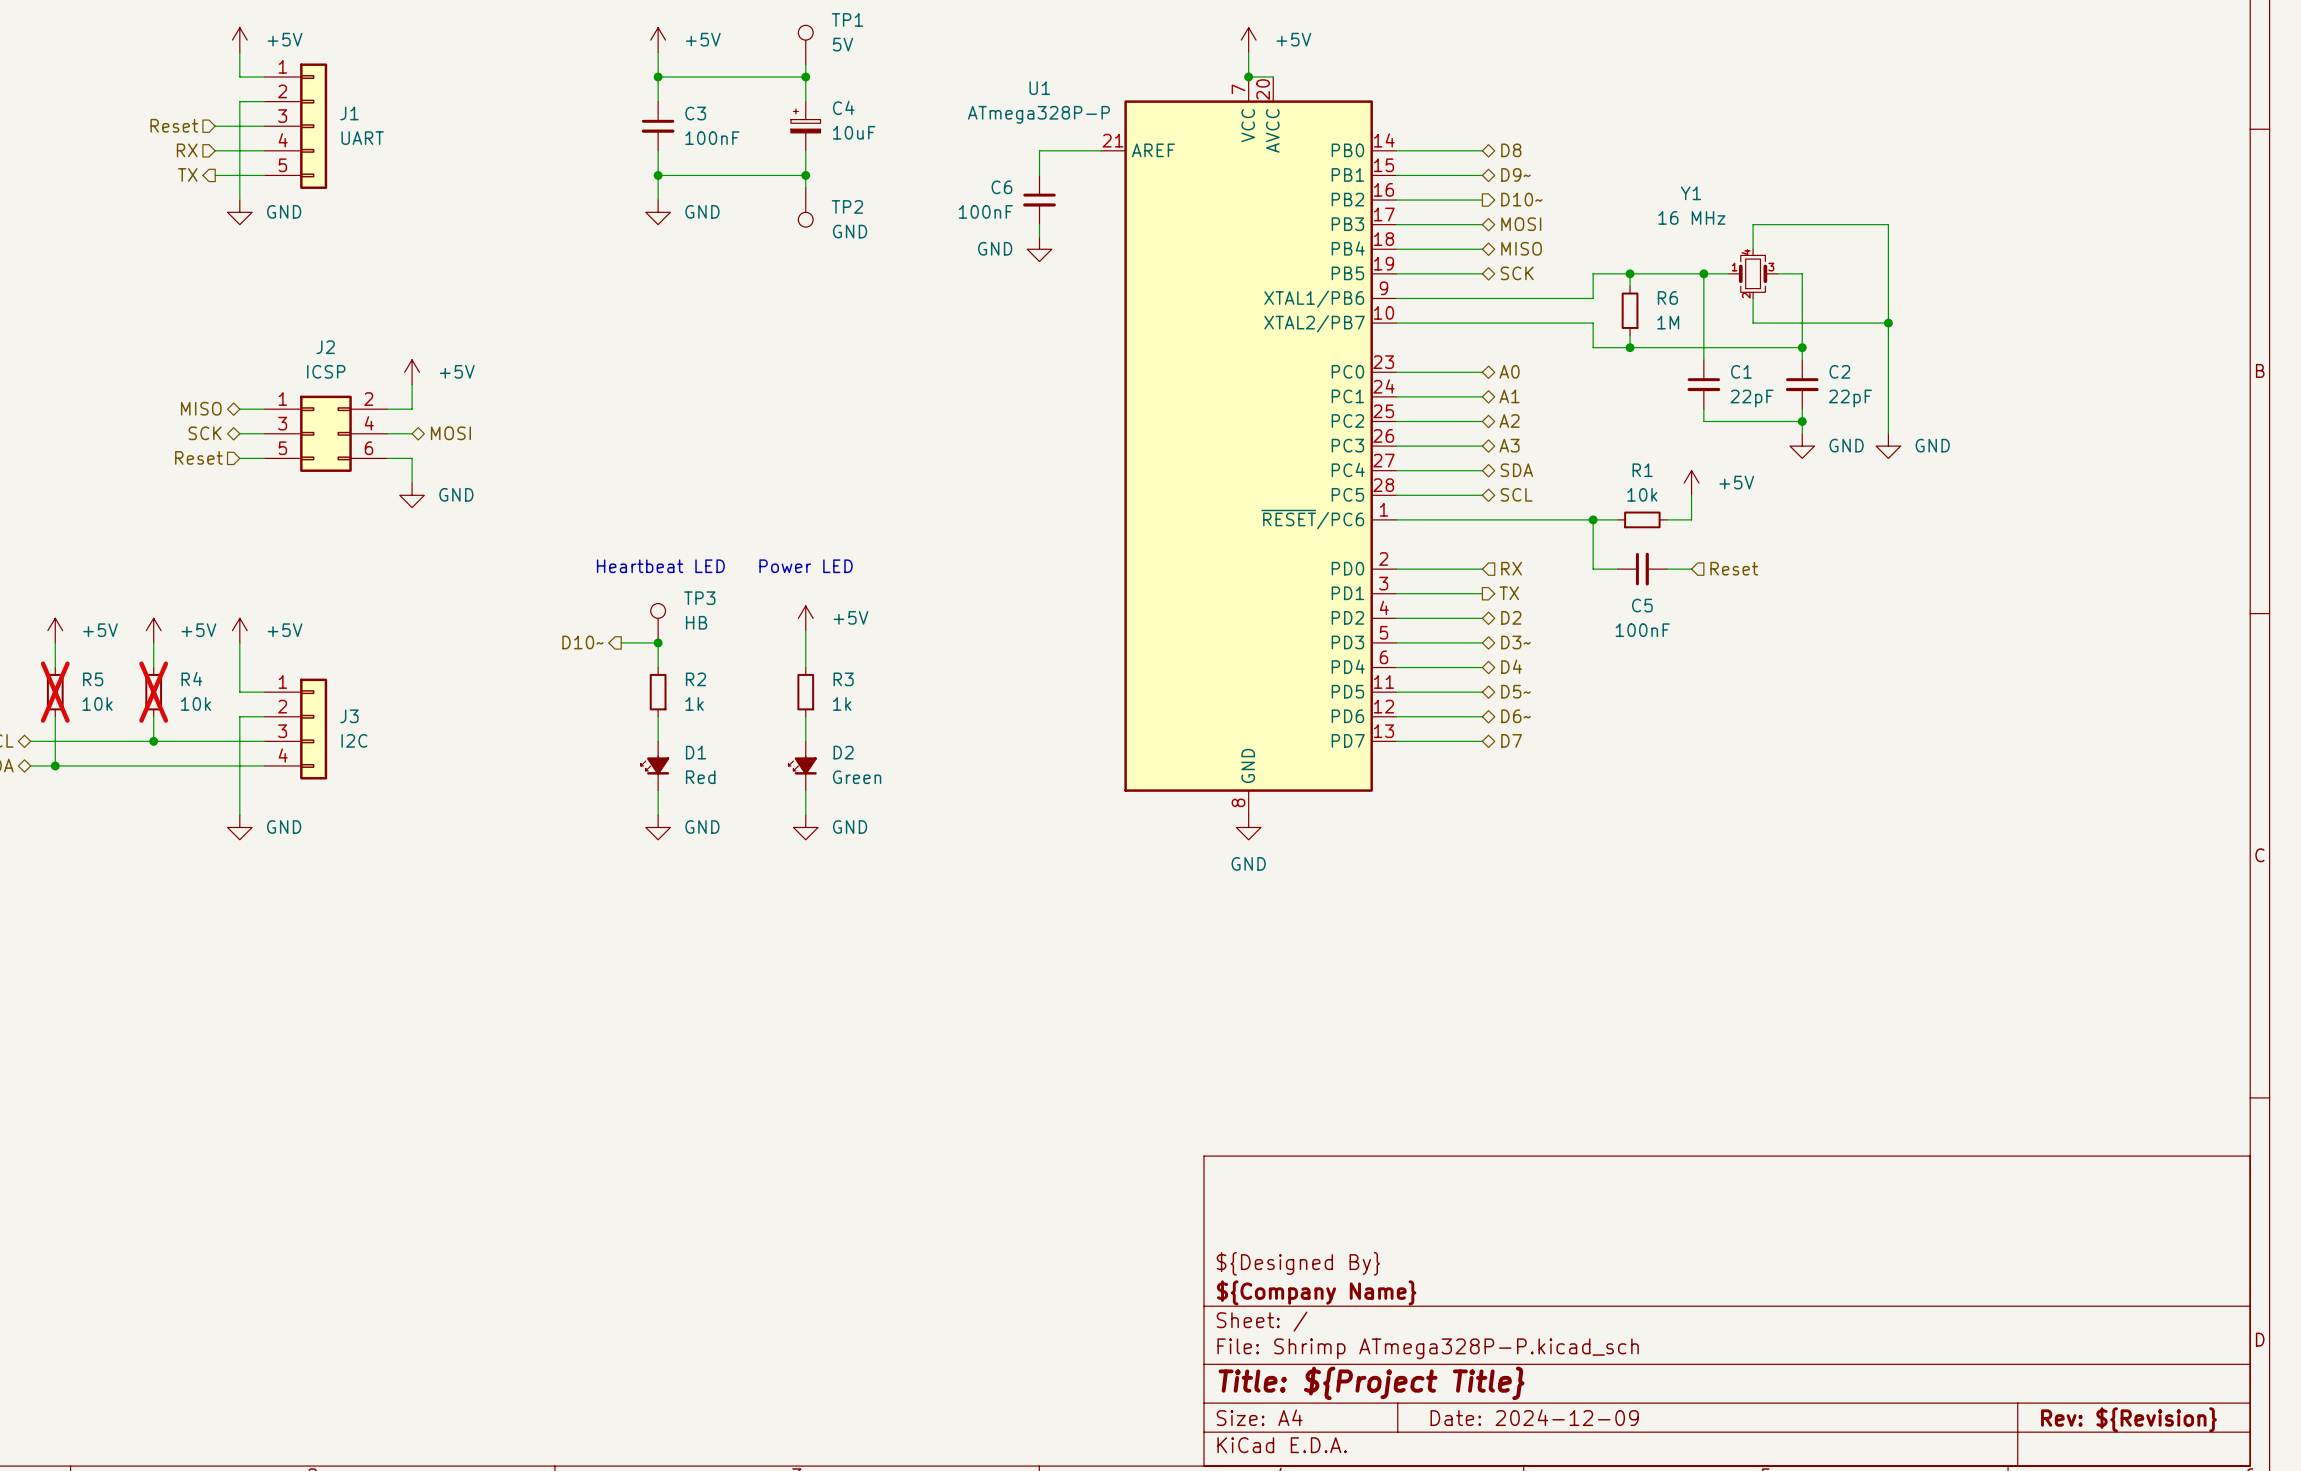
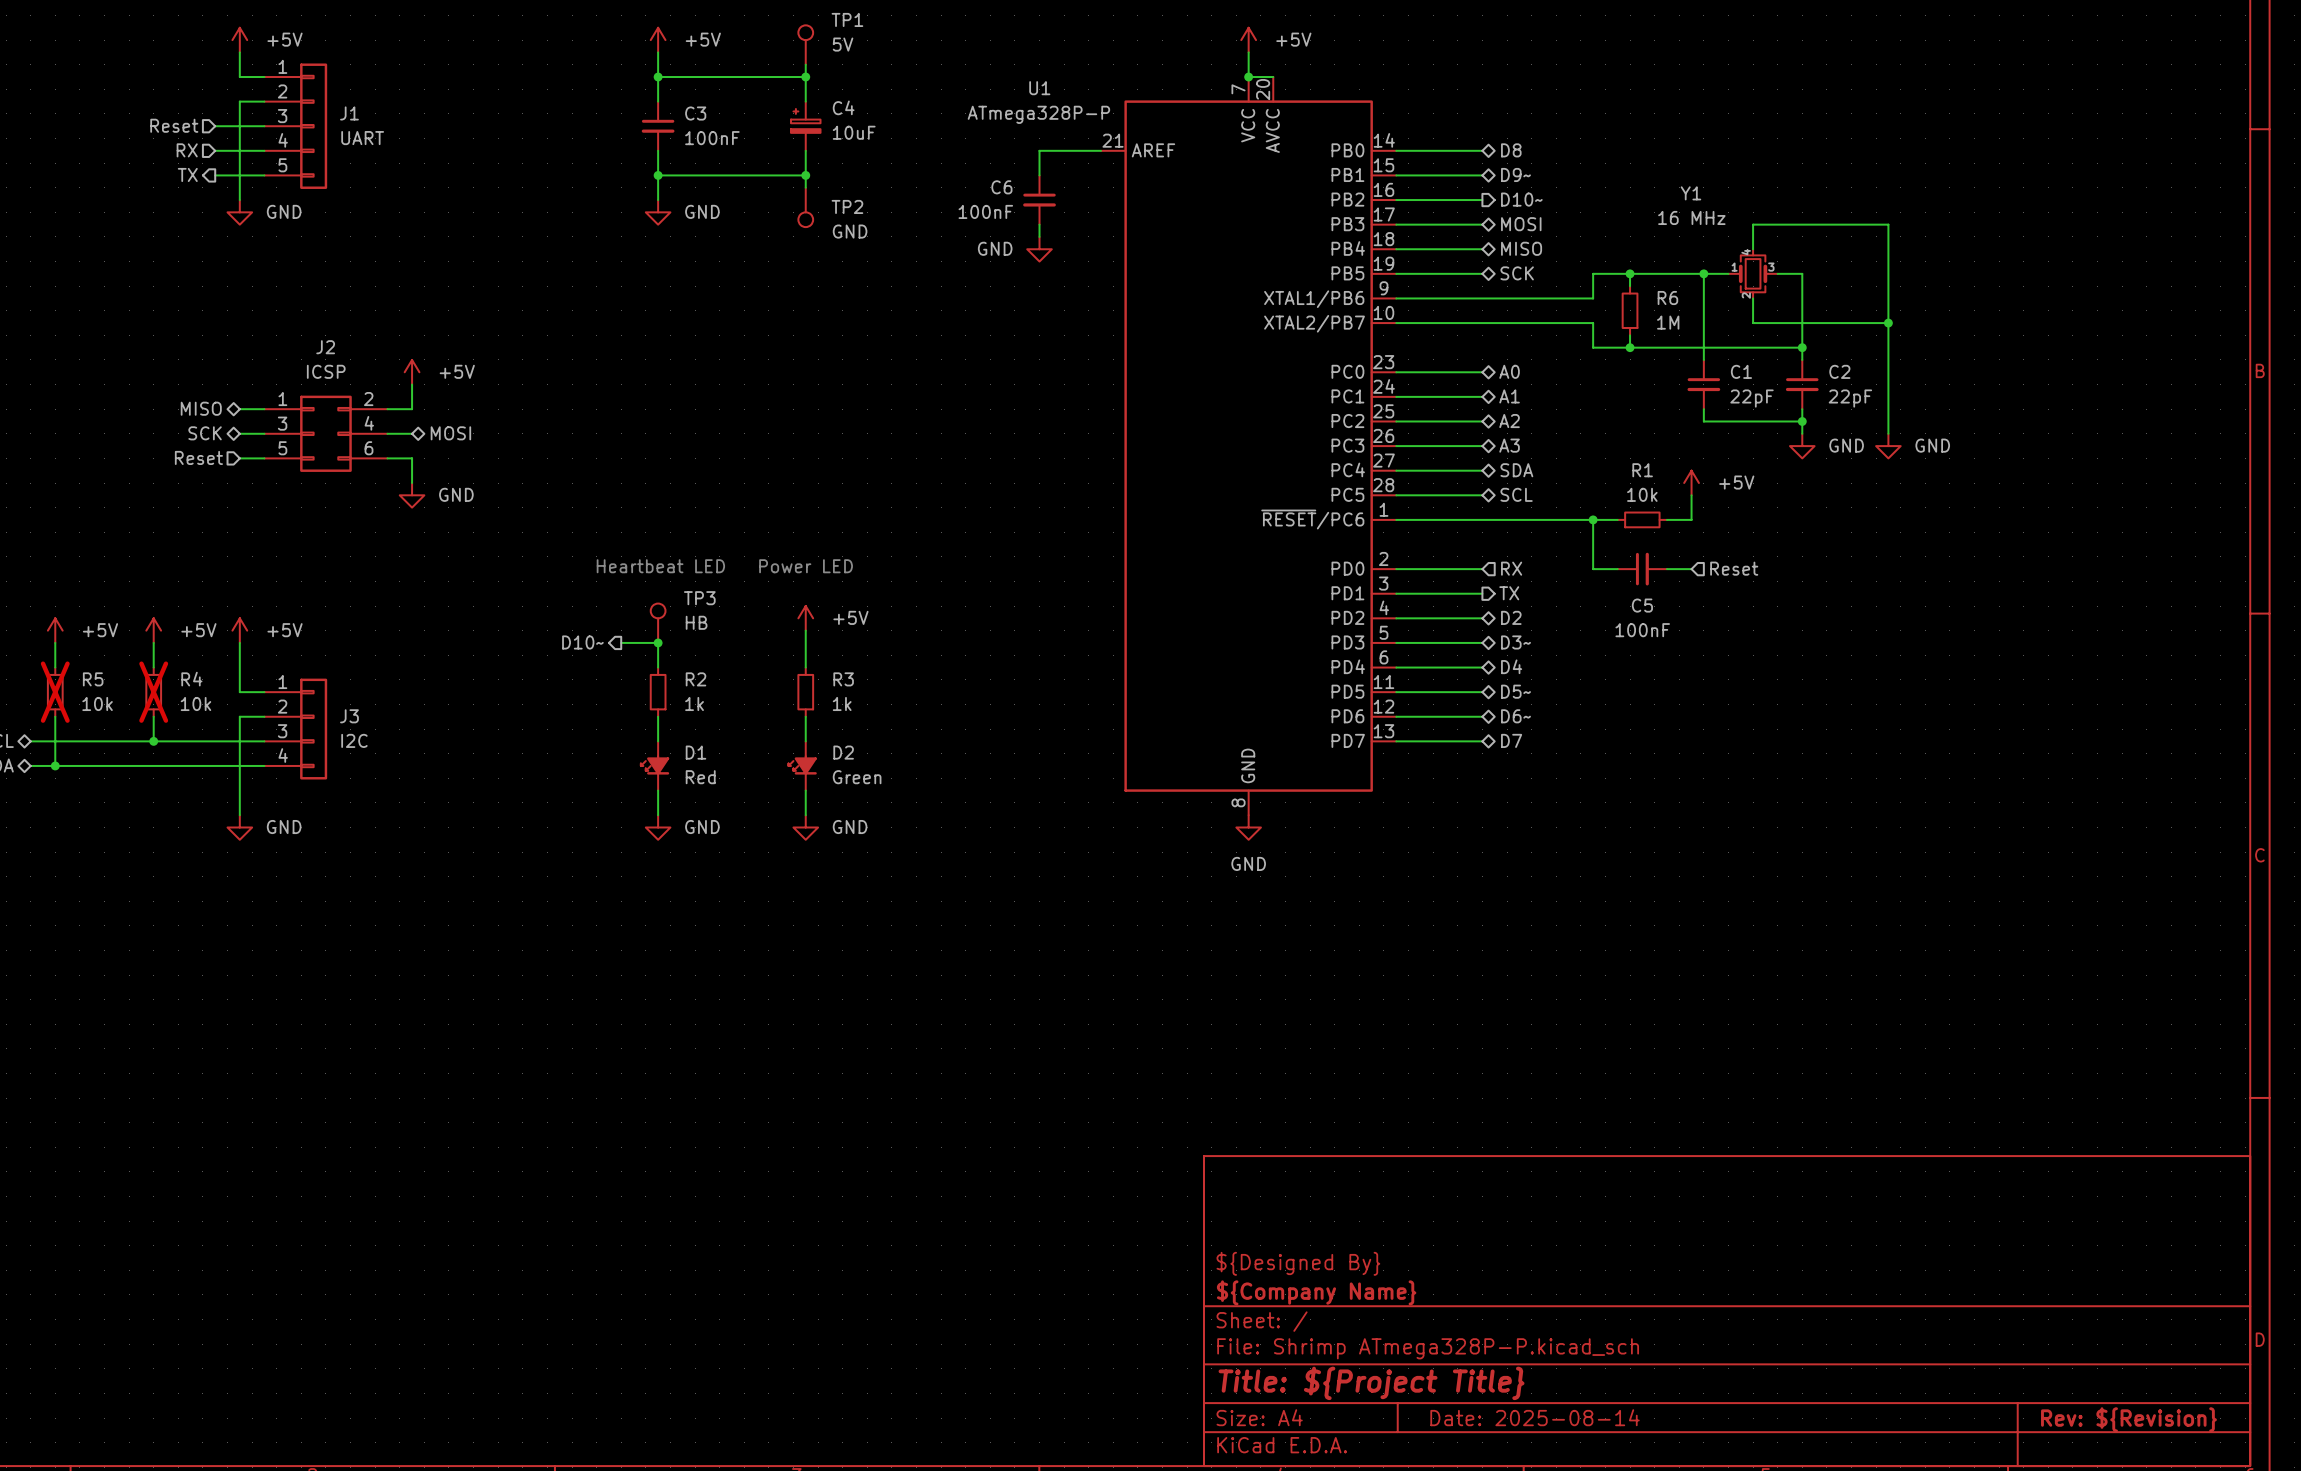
title block: Date: 2024-12-09 (1534, 1417) -> Date: 2025-08-14 (1535, 1417)

